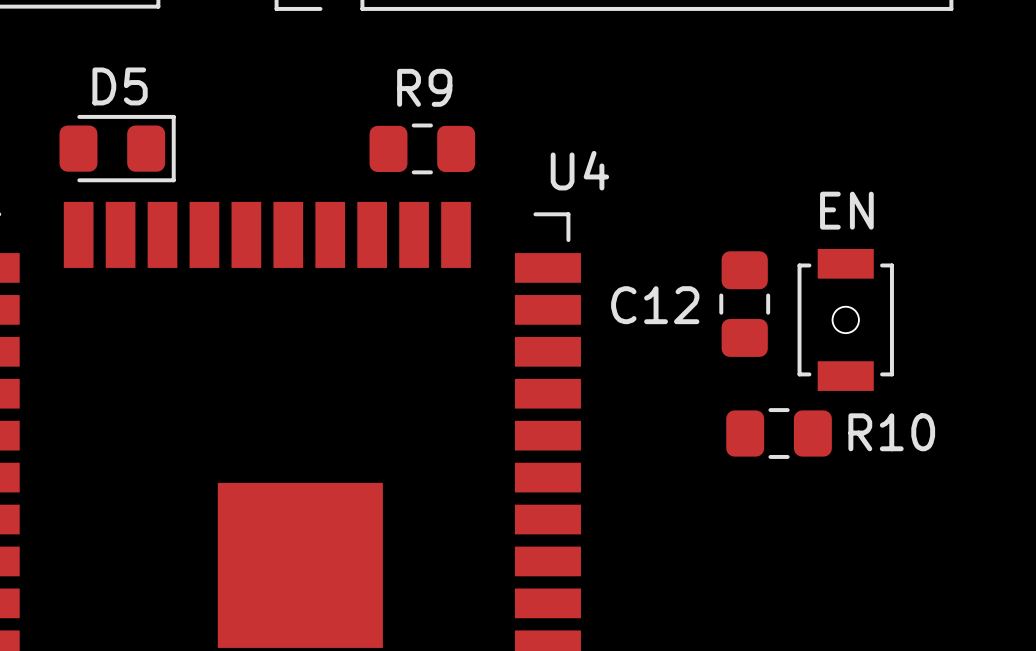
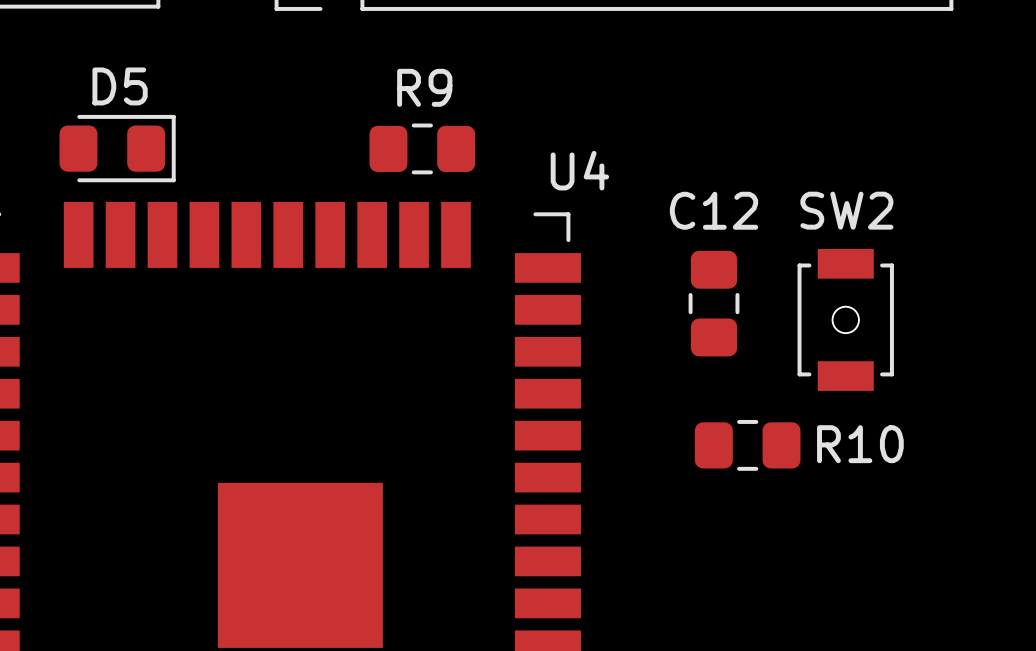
EN name: EN (846, 210) -> SW2 (846, 210)
C12 position: (744, 304) -> (714, 303)
C12 name position: C12 (655, 305) -> C12 (714, 210)
R10 position: (779, 433) -> (747, 445)

